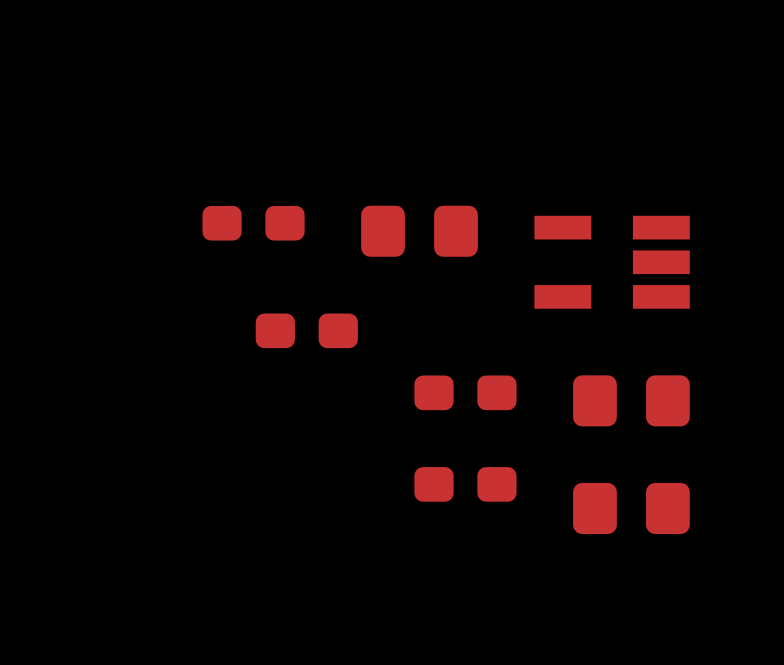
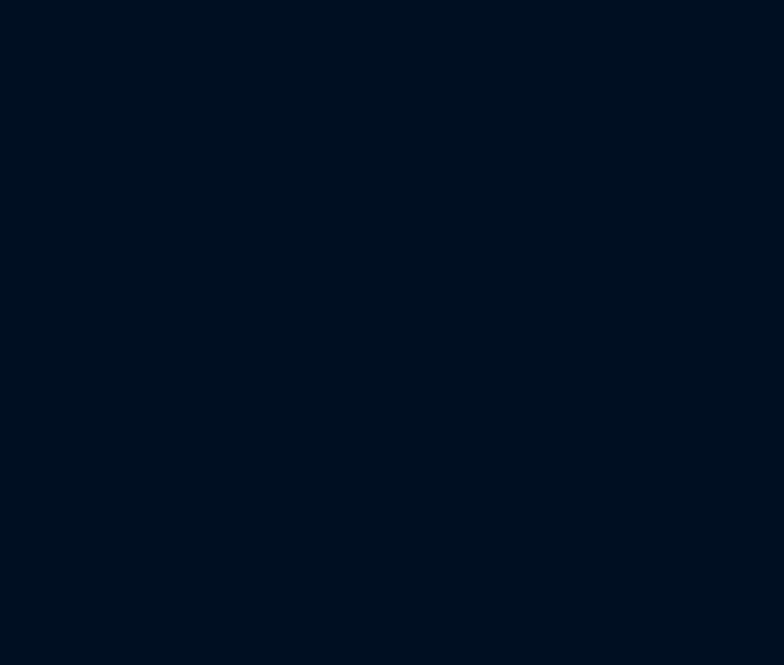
part: (253, 223) -> none
part: (419, 231) -> none
part: (612, 262) -> none
part: (306, 330) -> none
part: (465, 392) -> none
part: (631, 400) -> none
part: (465, 484) -> none
part: (631, 508) -> none

